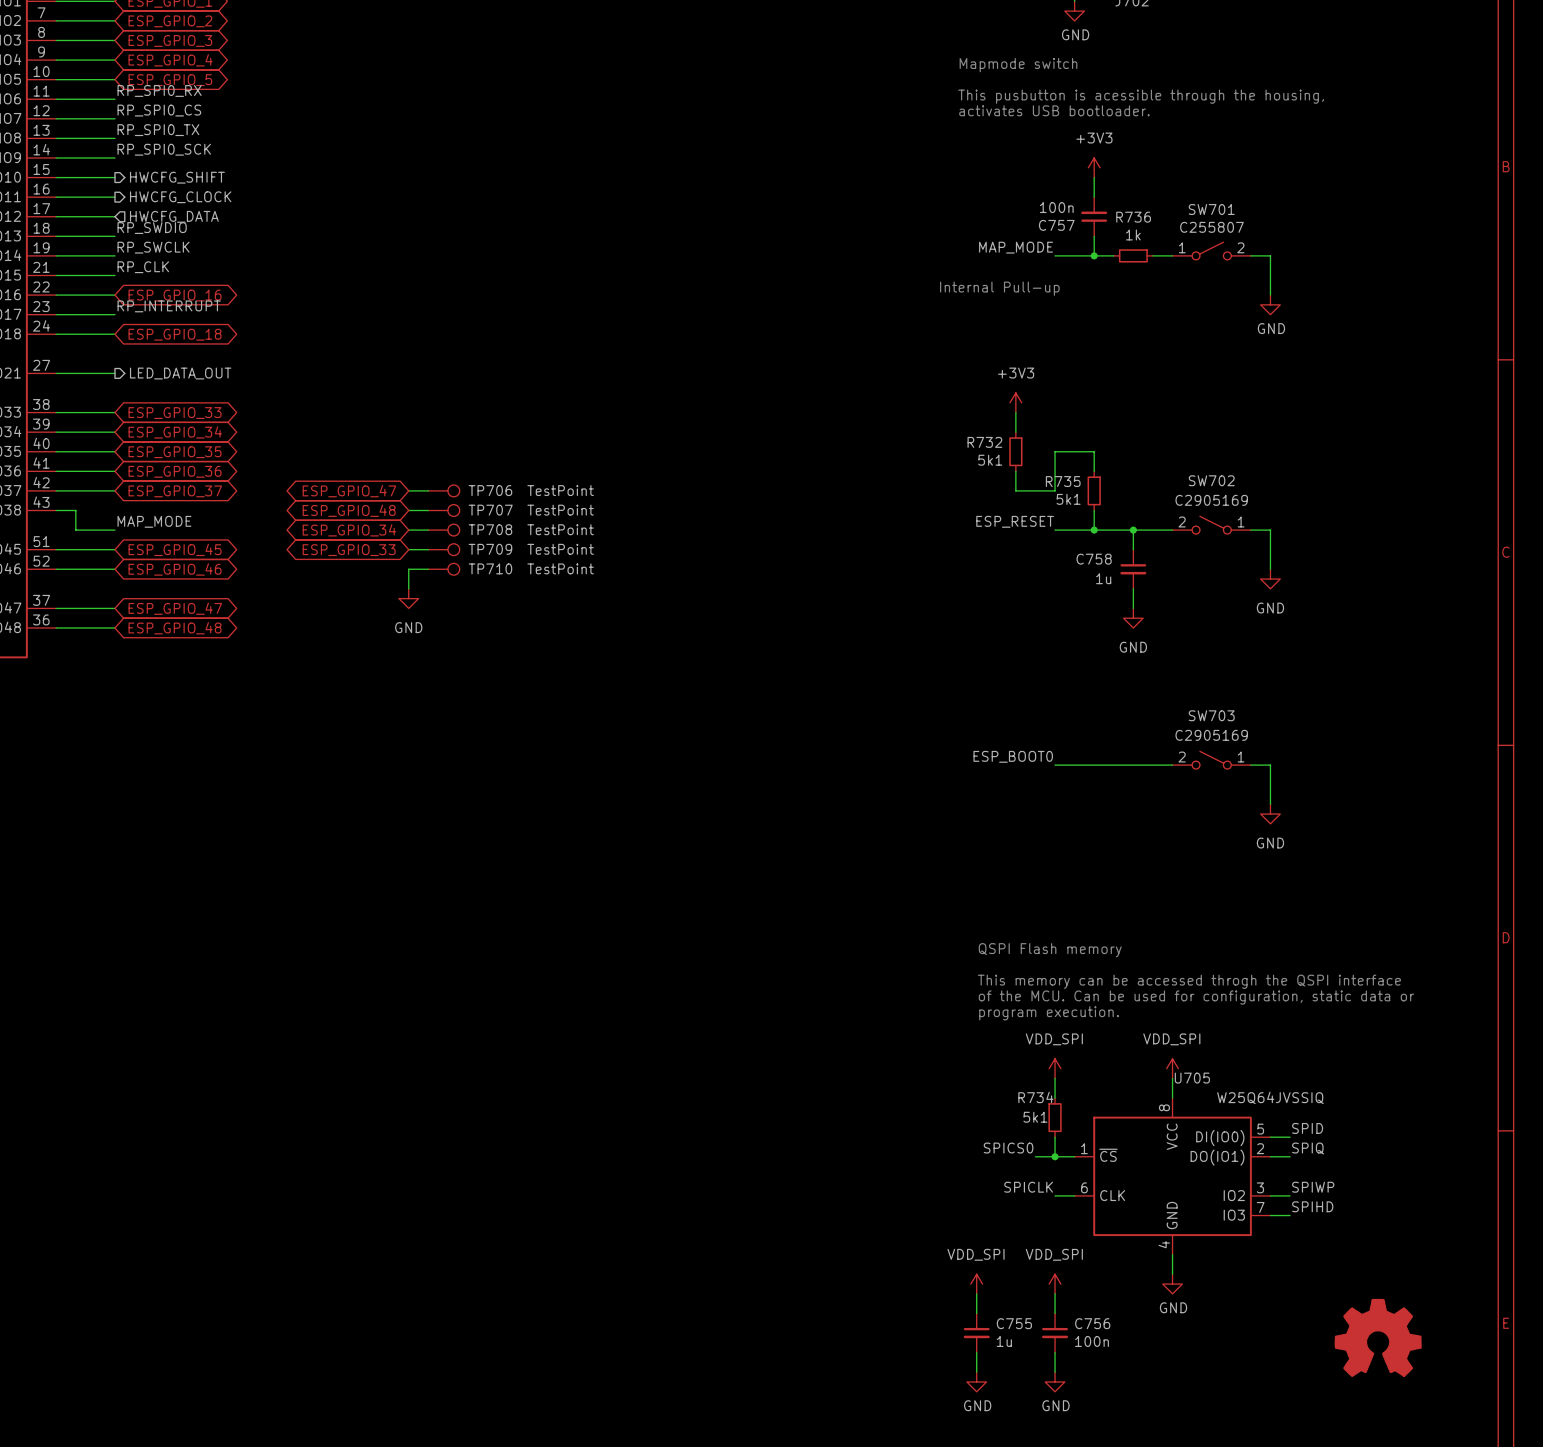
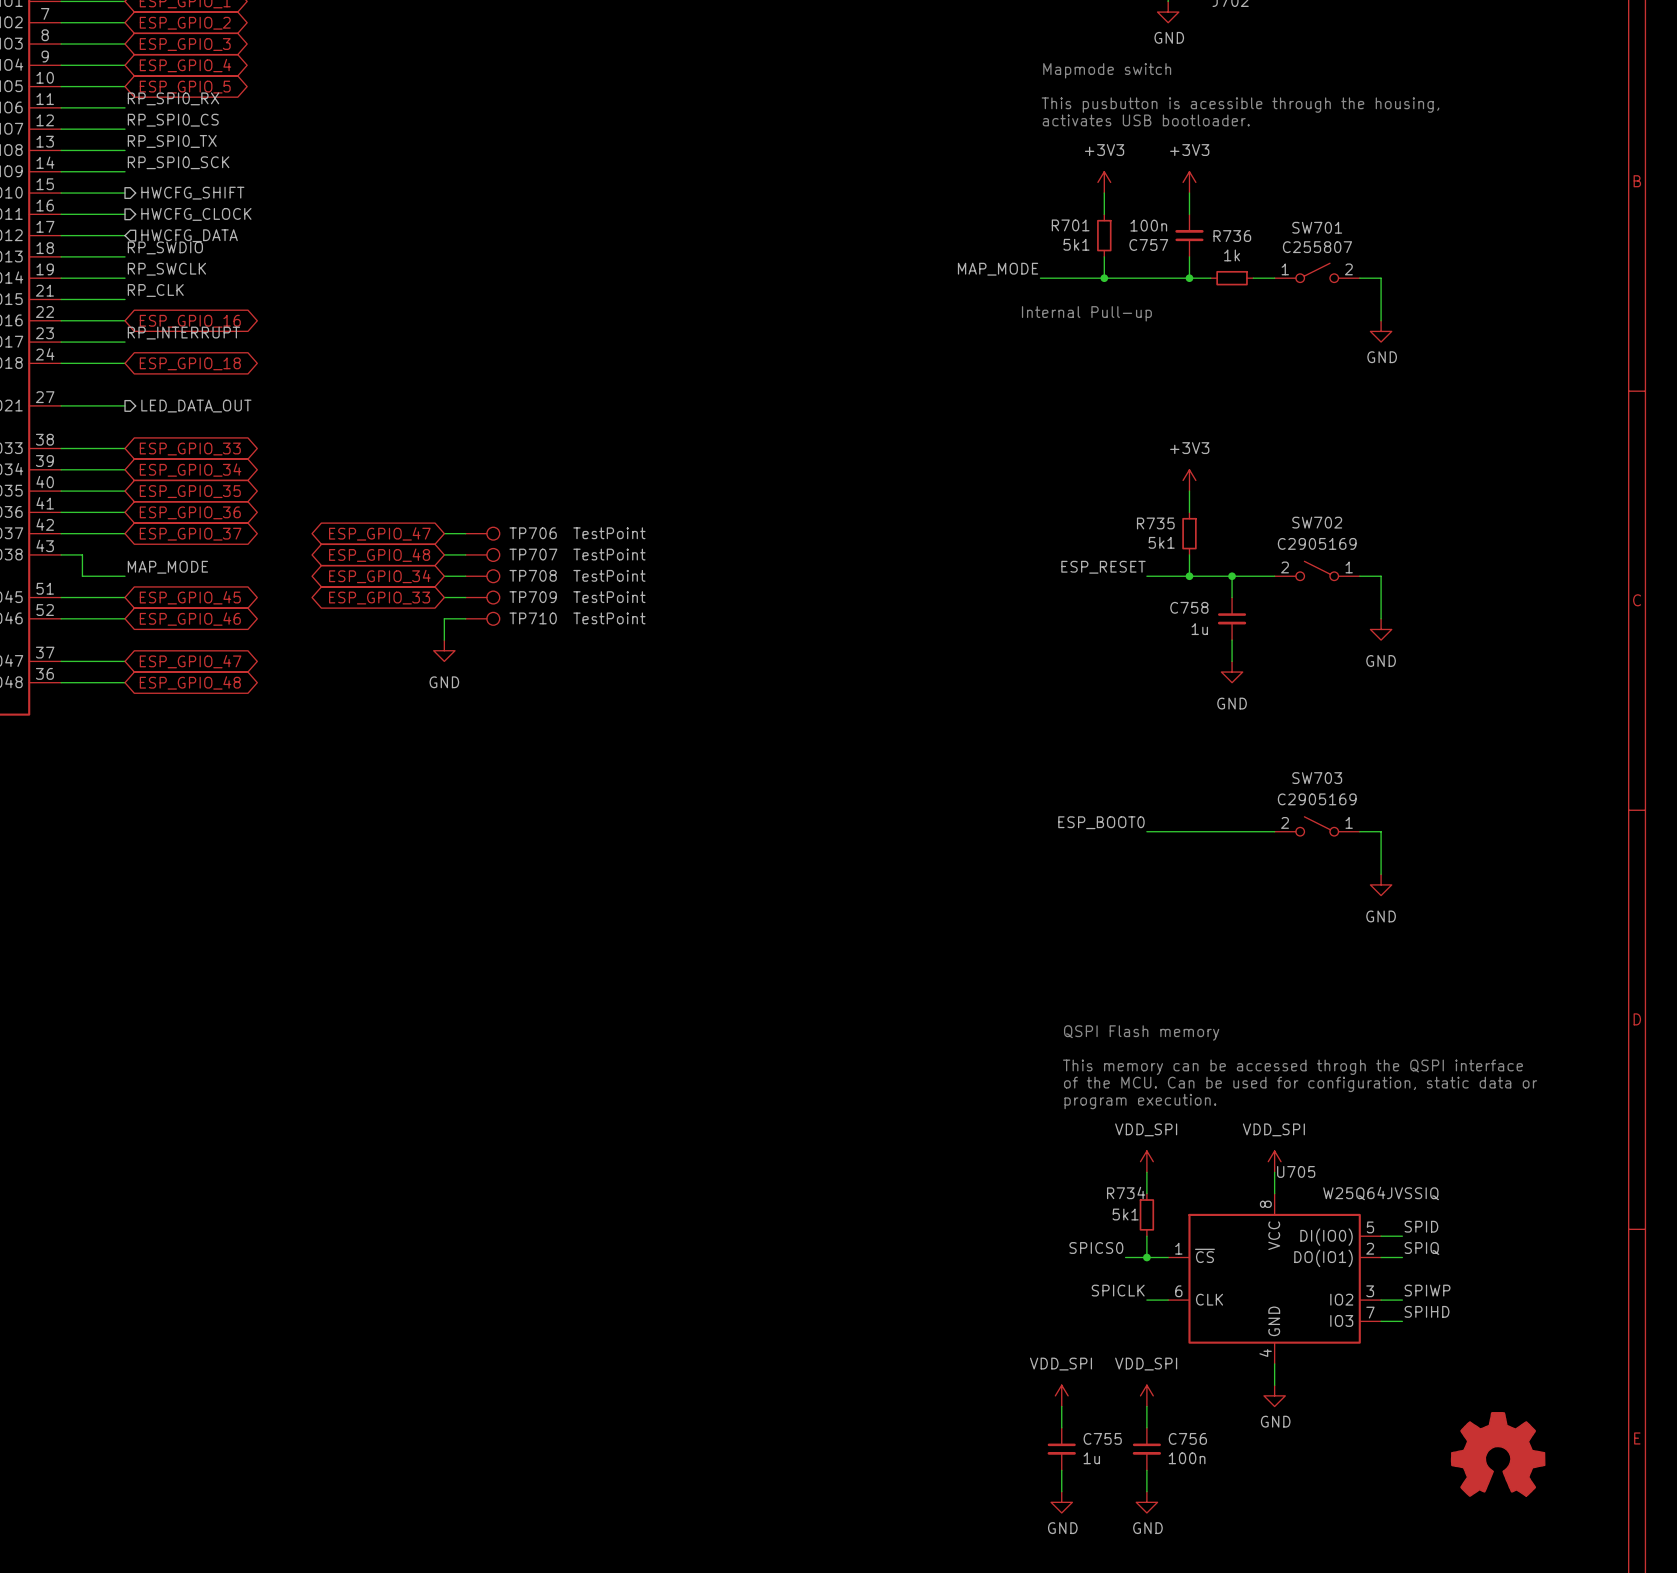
power symbol: none -> +3V3 (1104, 182)
wire: none -> (1104, 193) (1104, 214)
R701: none -> 5k1 (1104, 235)
label position: MAP_MODE (1016, 247) -> MAP_MODE (998, 269)
wire: none -> (1040, 278) (1146, 278)
junction: none -> (1104, 278)
power symbol position: +3V3 (1015, 402) -> +3V3 (1189, 480)
wire: (1015, 412) (1015, 432) -> (1104, 256) (1104, 278)
R732: 5k1 (1015, 451) -> none
wire: (1094, 451) (1055, 451) (1055, 490) (1015, 490) (1015, 471) -> none

